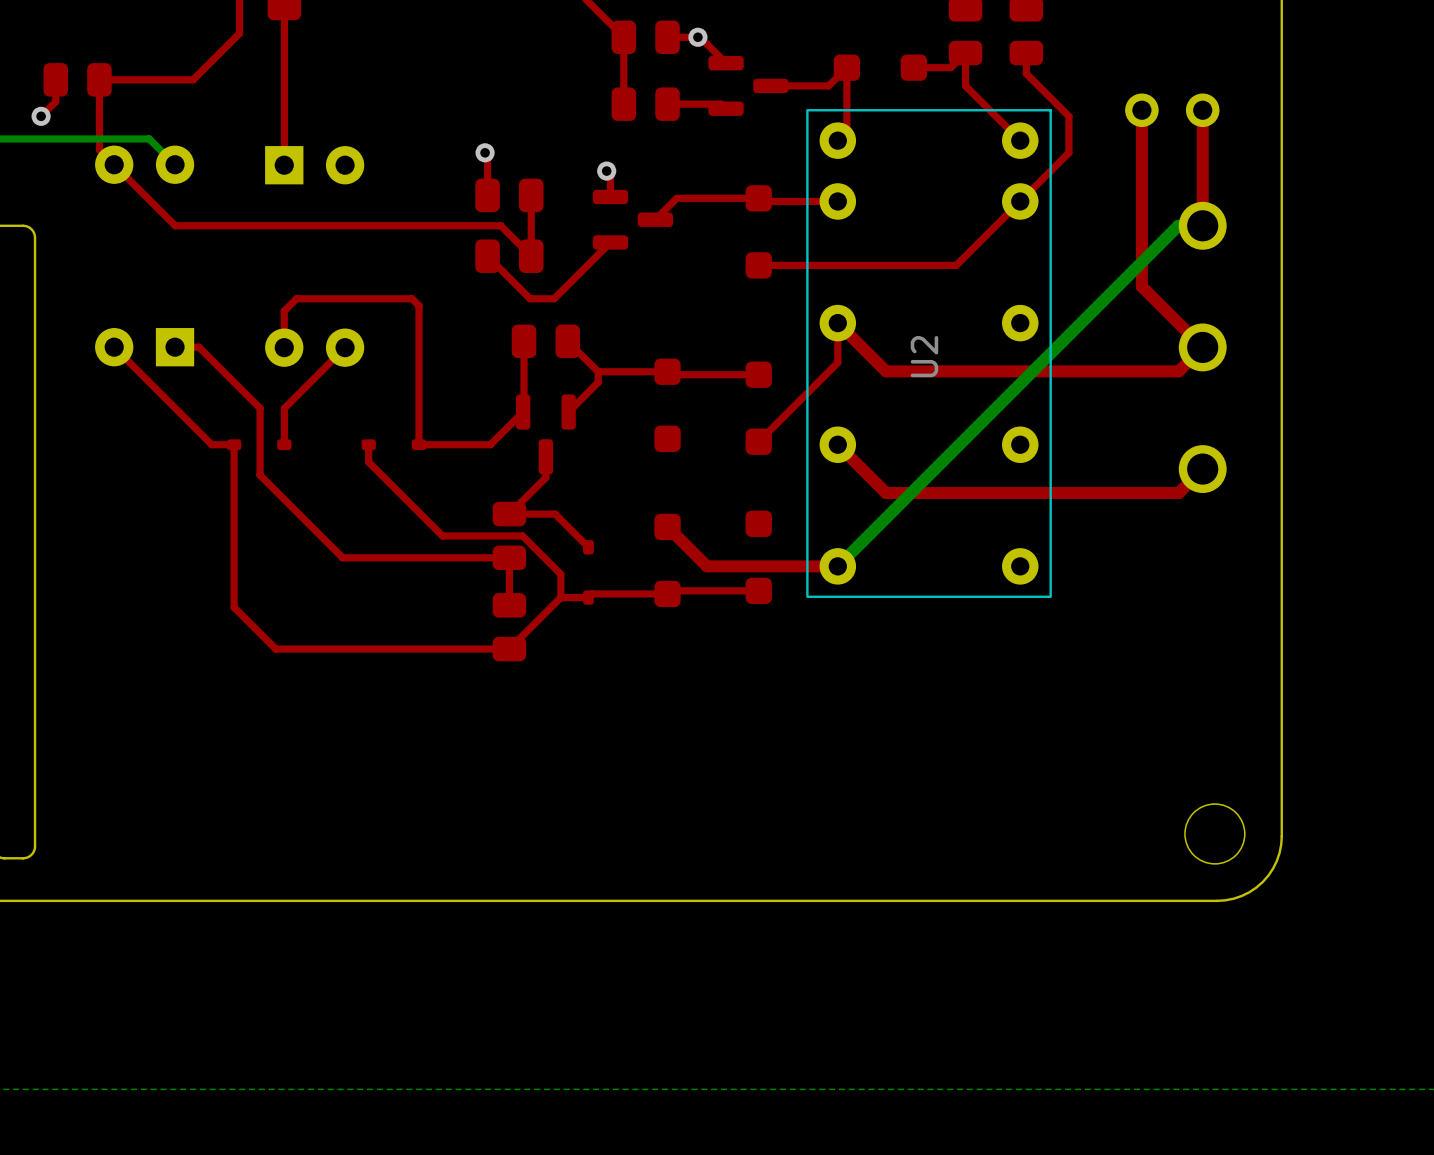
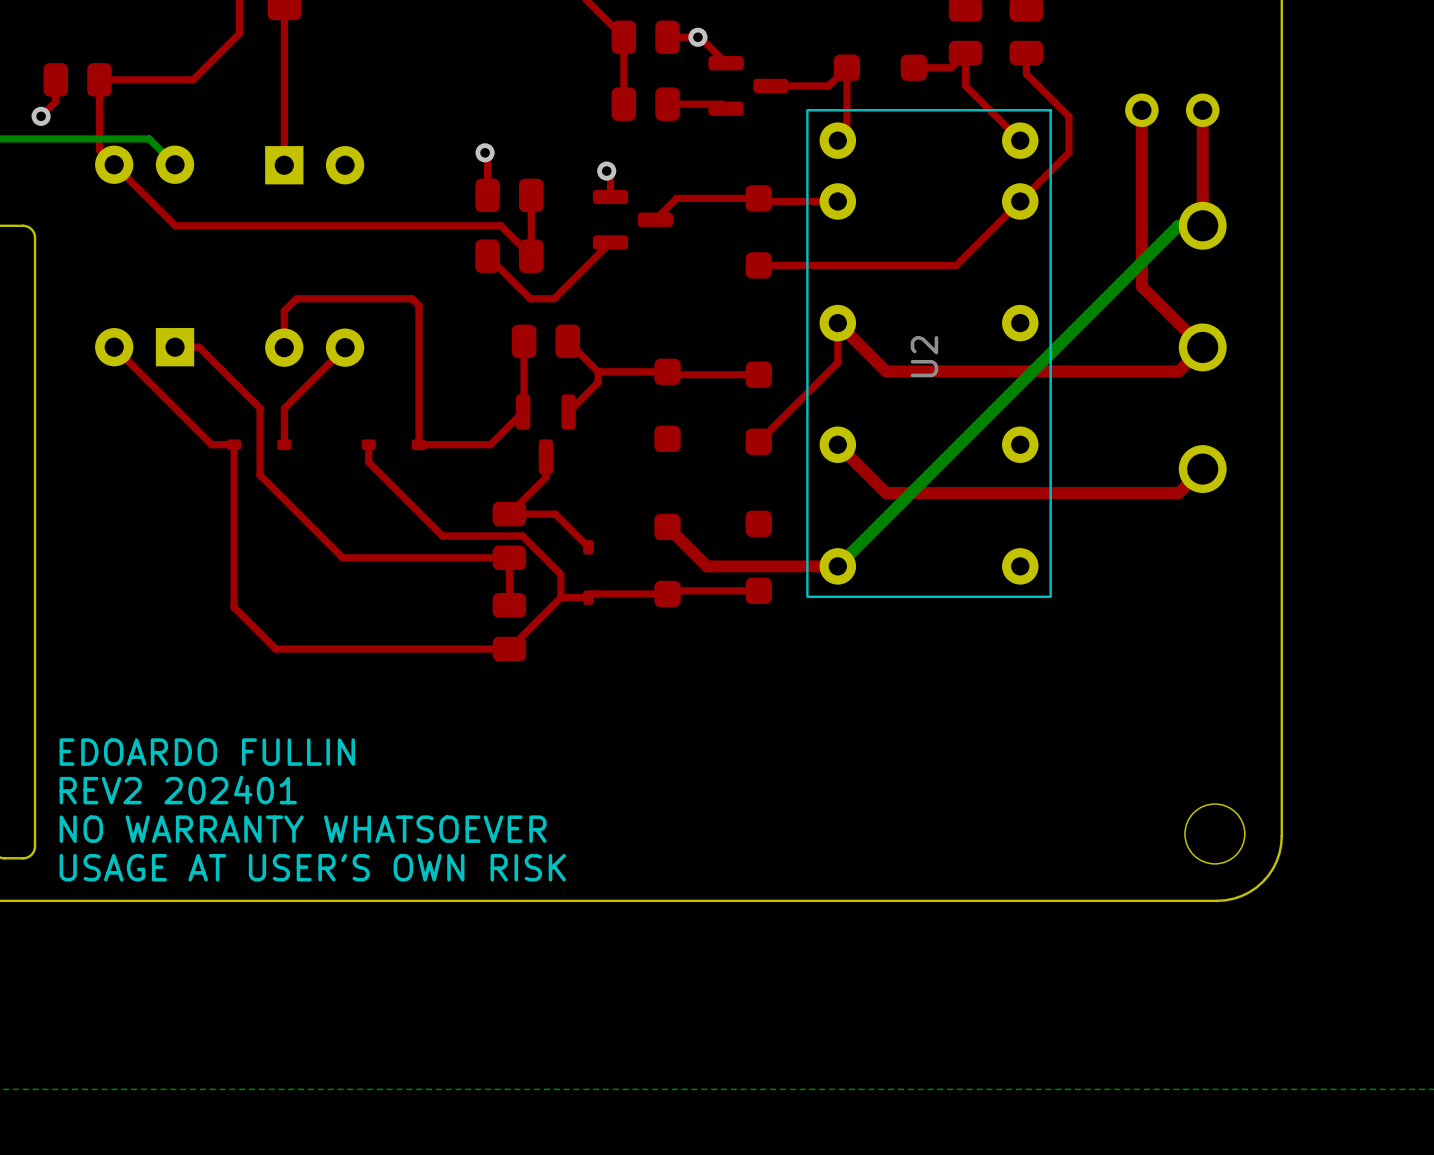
text: none -> EDOARDO FULLIN (207, 752)
text: none -> REV2 202401 (178, 790)
text: none -> NO WARRANTY WHATSOEVER (303, 829)
text: none -> USAGE AT USER'S OWN RISK (312, 867)

